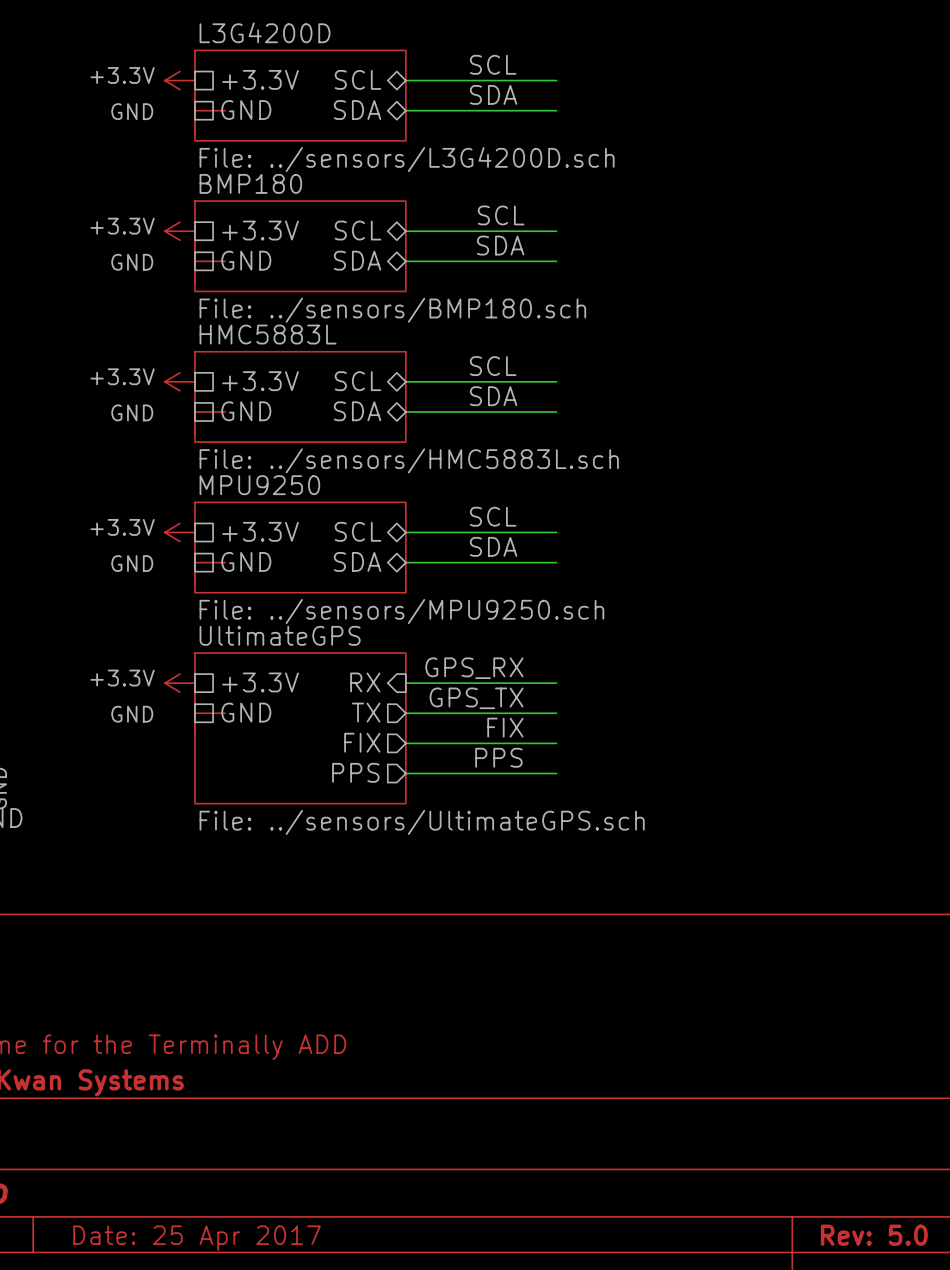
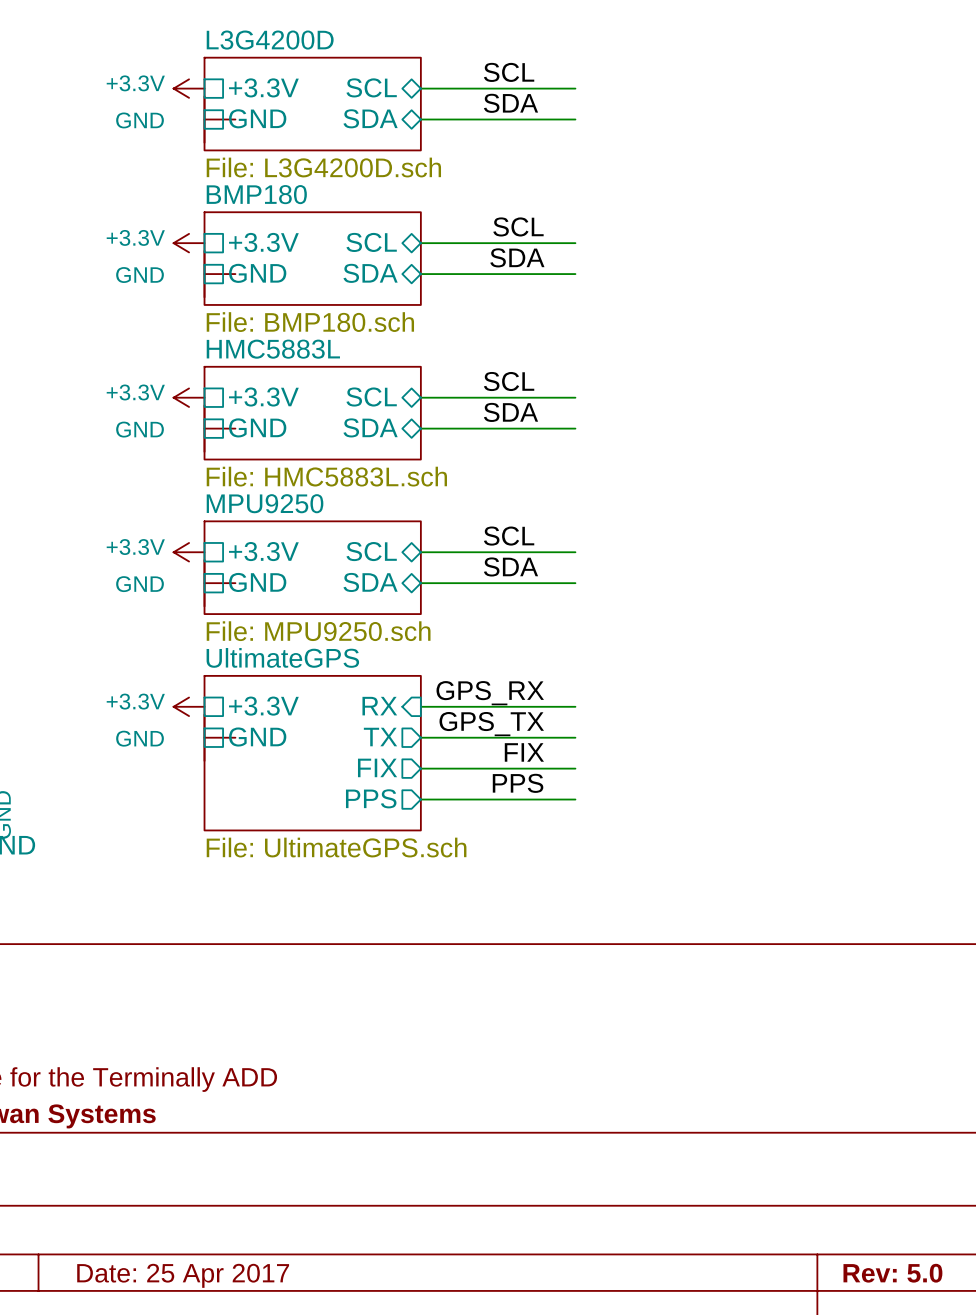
sheet L3G4200D value: File: ../sensors/L3G4200D.sch (407, 159) -> File: L3G4200D.sch (323, 167)
sheet BMP180 value: File: ../sensors/BMP180.sch (392, 310) -> File: BMP180.sch (310, 322)
sheet HMC5883L value: File: ../sensors/HMC5883L.sch (409, 460) -> File: HMC5883L.sch (326, 476)
sheet MPU9250 value: File: ../sensors/MPU9250.sch (401, 611) -> File: MPU9250.sch (318, 631)
sheet UltimateGPS value: File: ../sensors/UltimateGPS.sch (422, 822) -> File: UltimateGPS.sch (336, 847)

